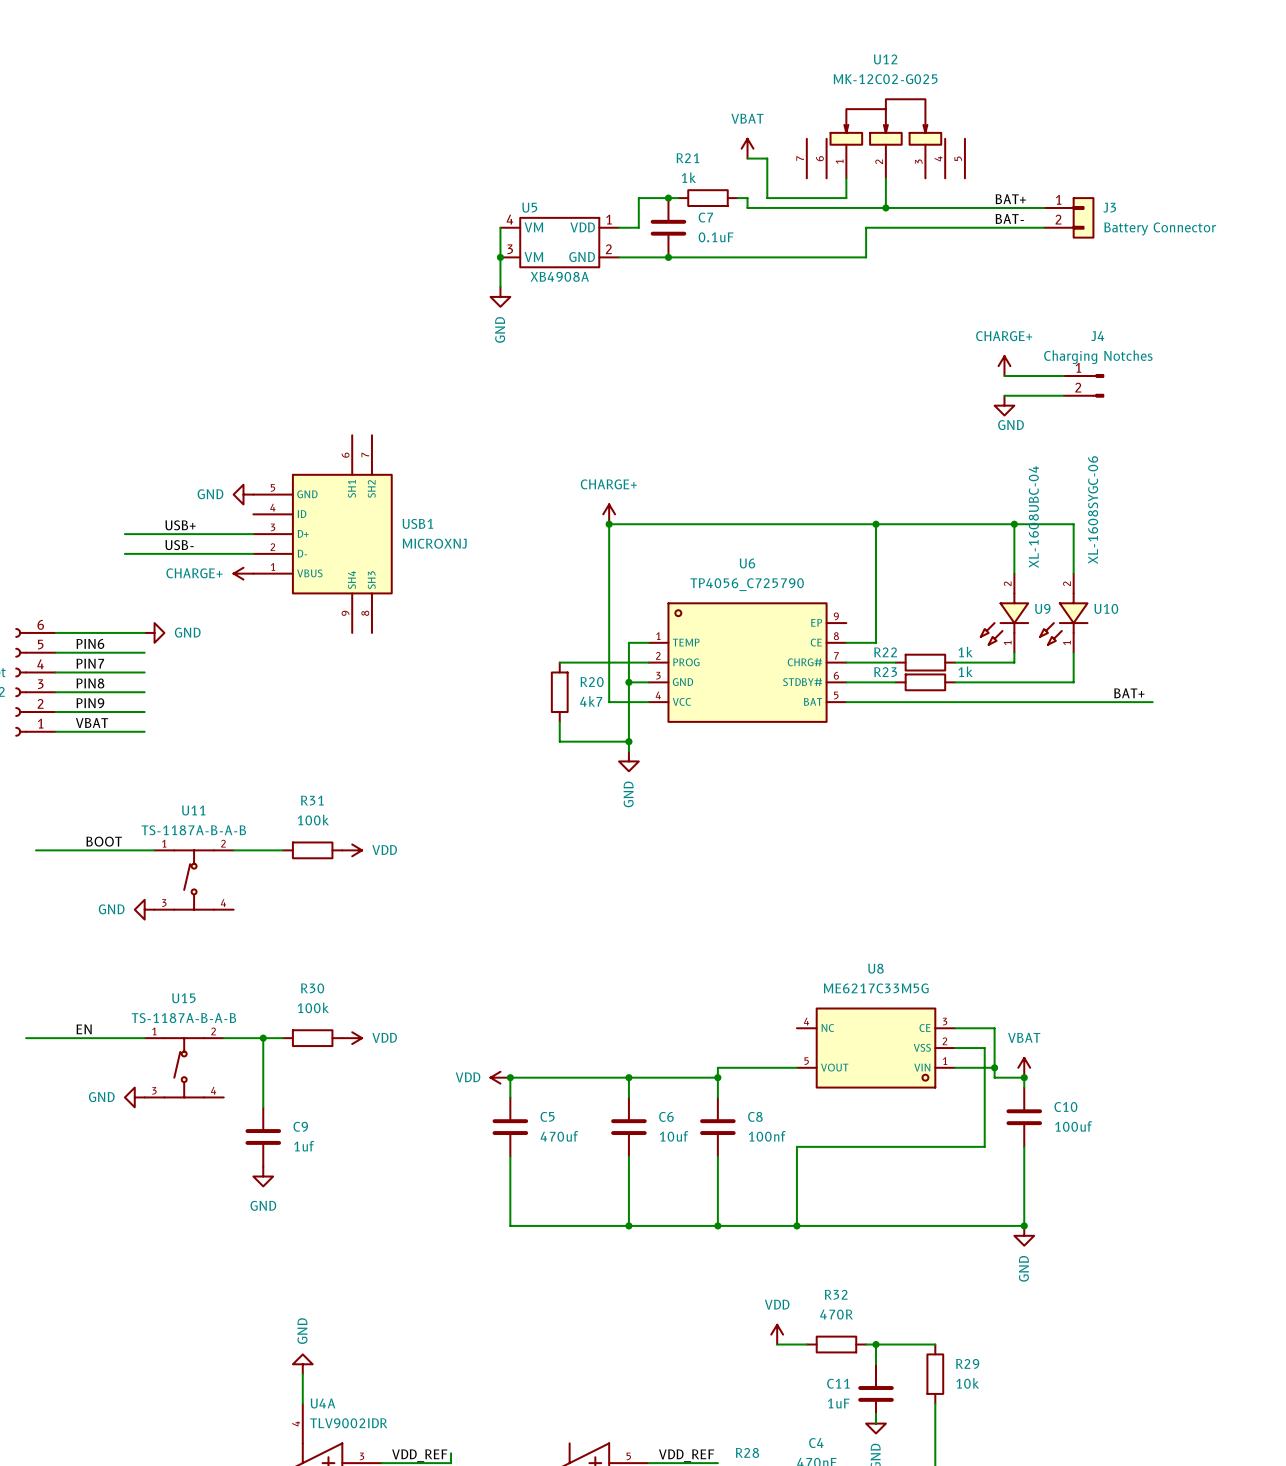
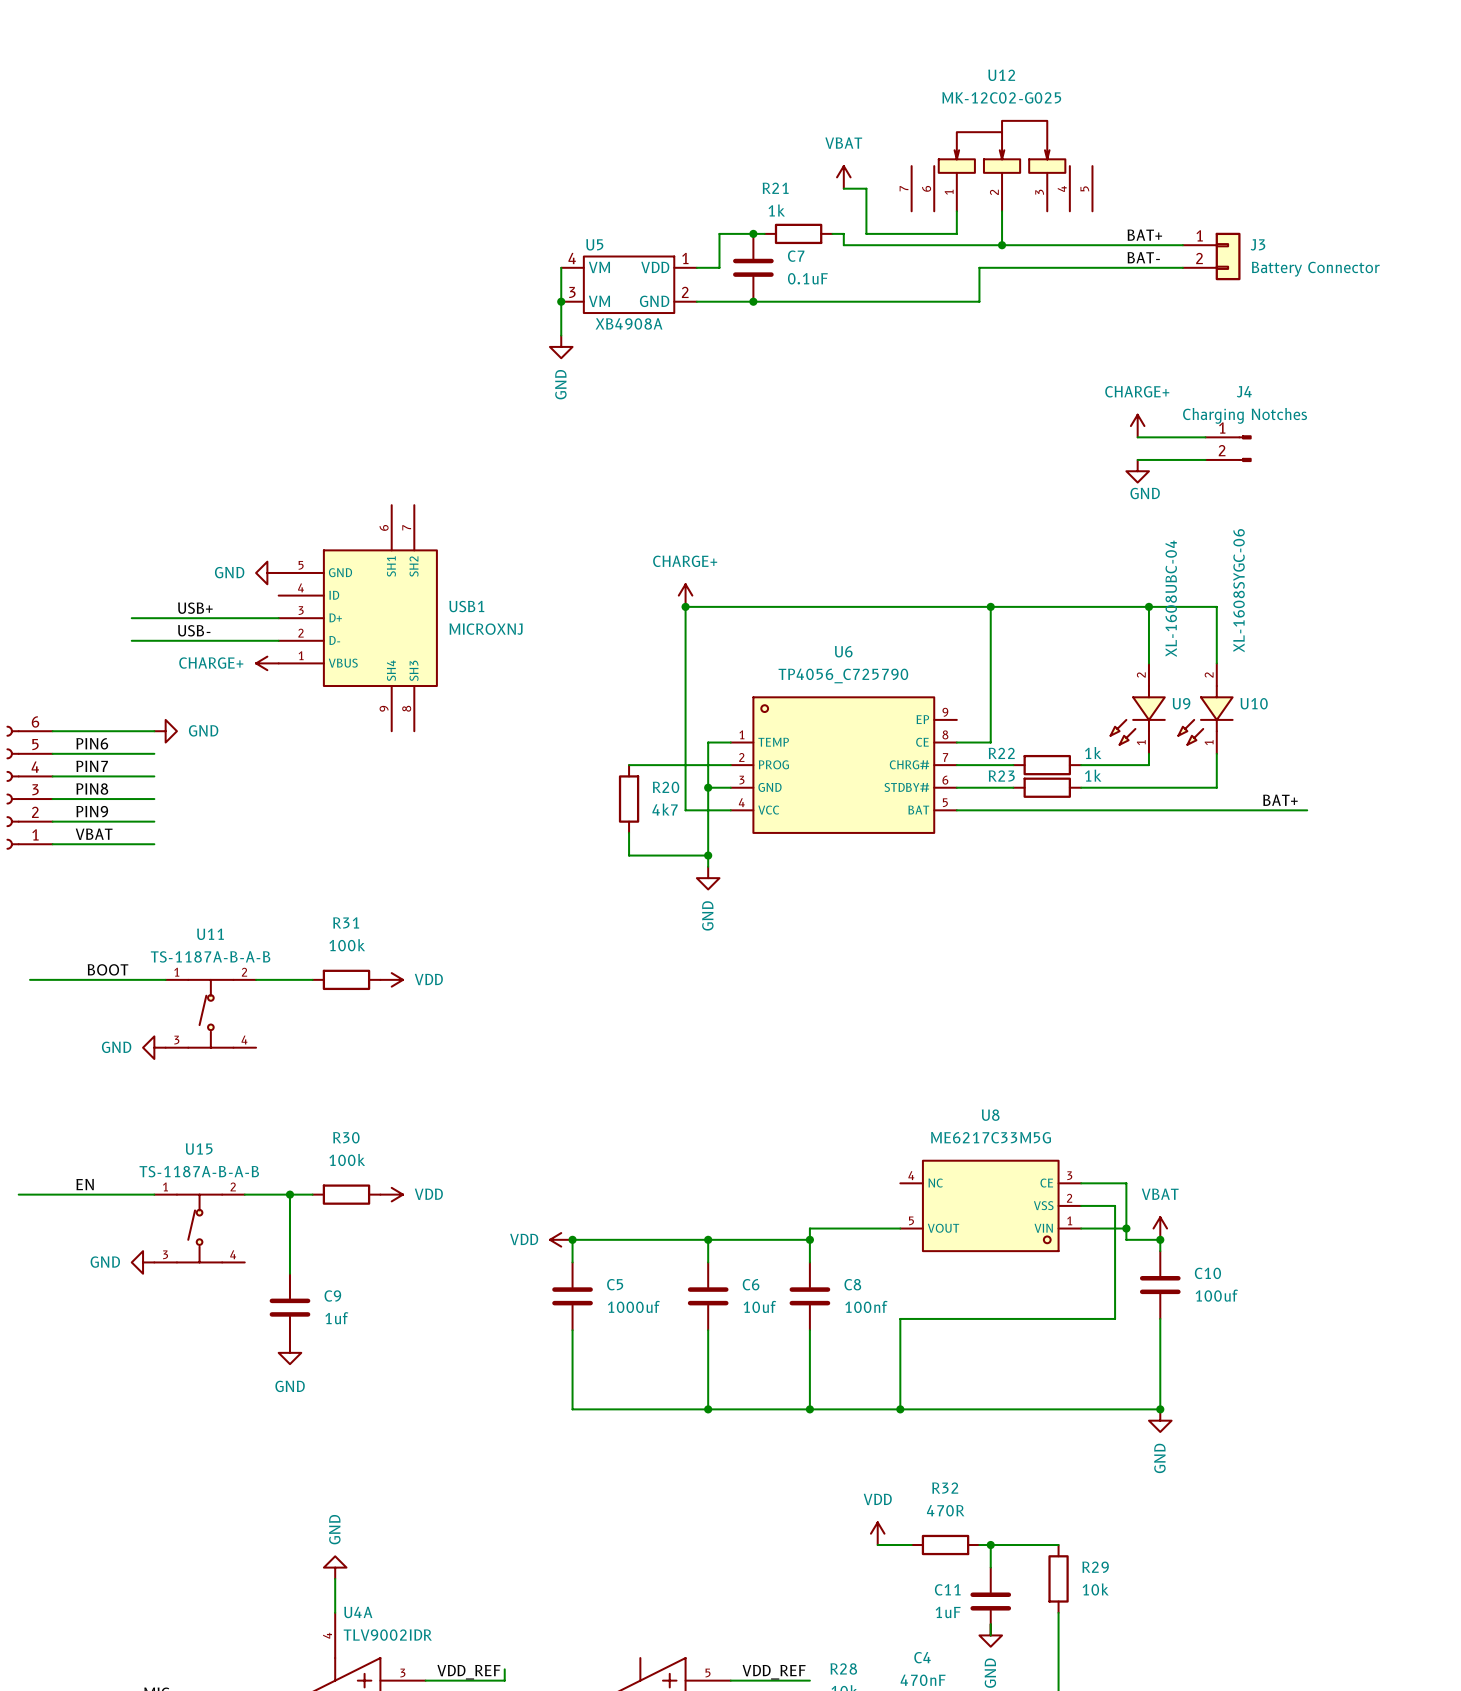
C5 value: 470uf (559, 1136) -> 1000uf (633, 1306)

